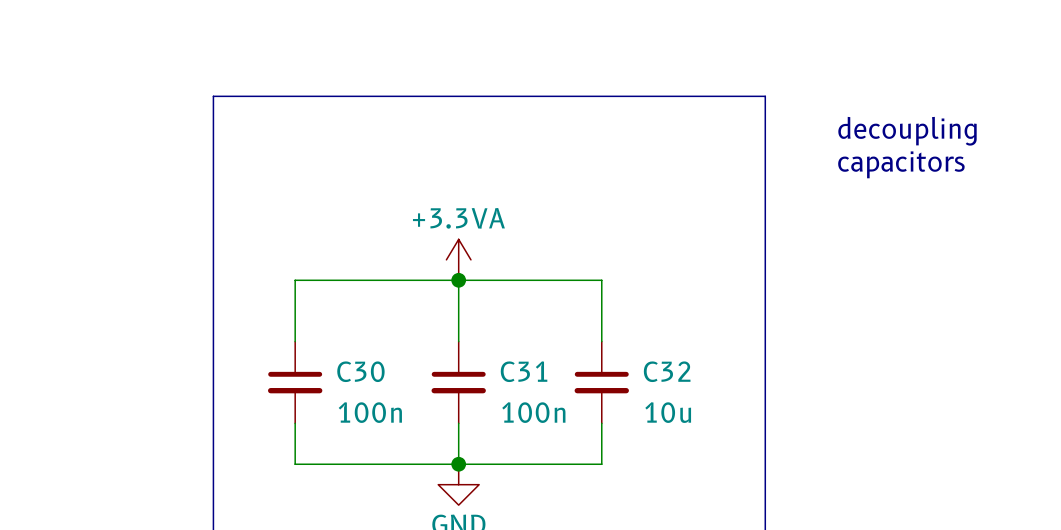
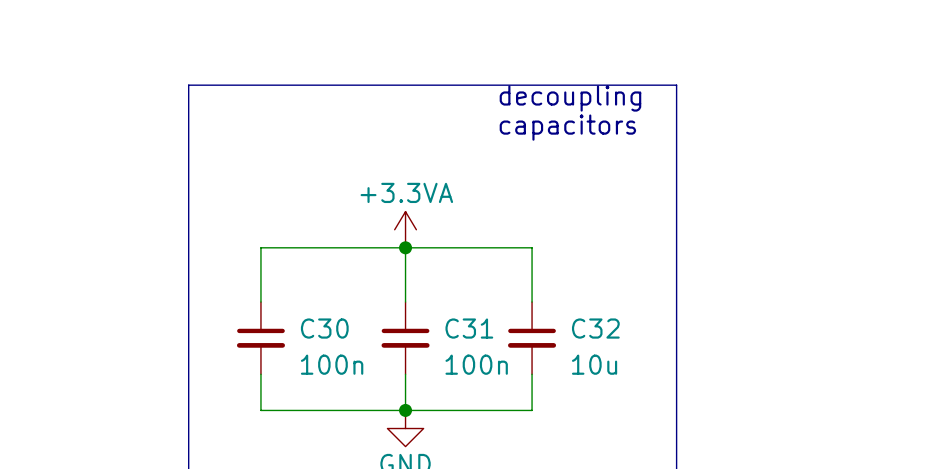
text position: decoupling (907, 131) -> decoupling (570, 98)
text position: capacitors (901, 164) -> capacitors (567, 127)

